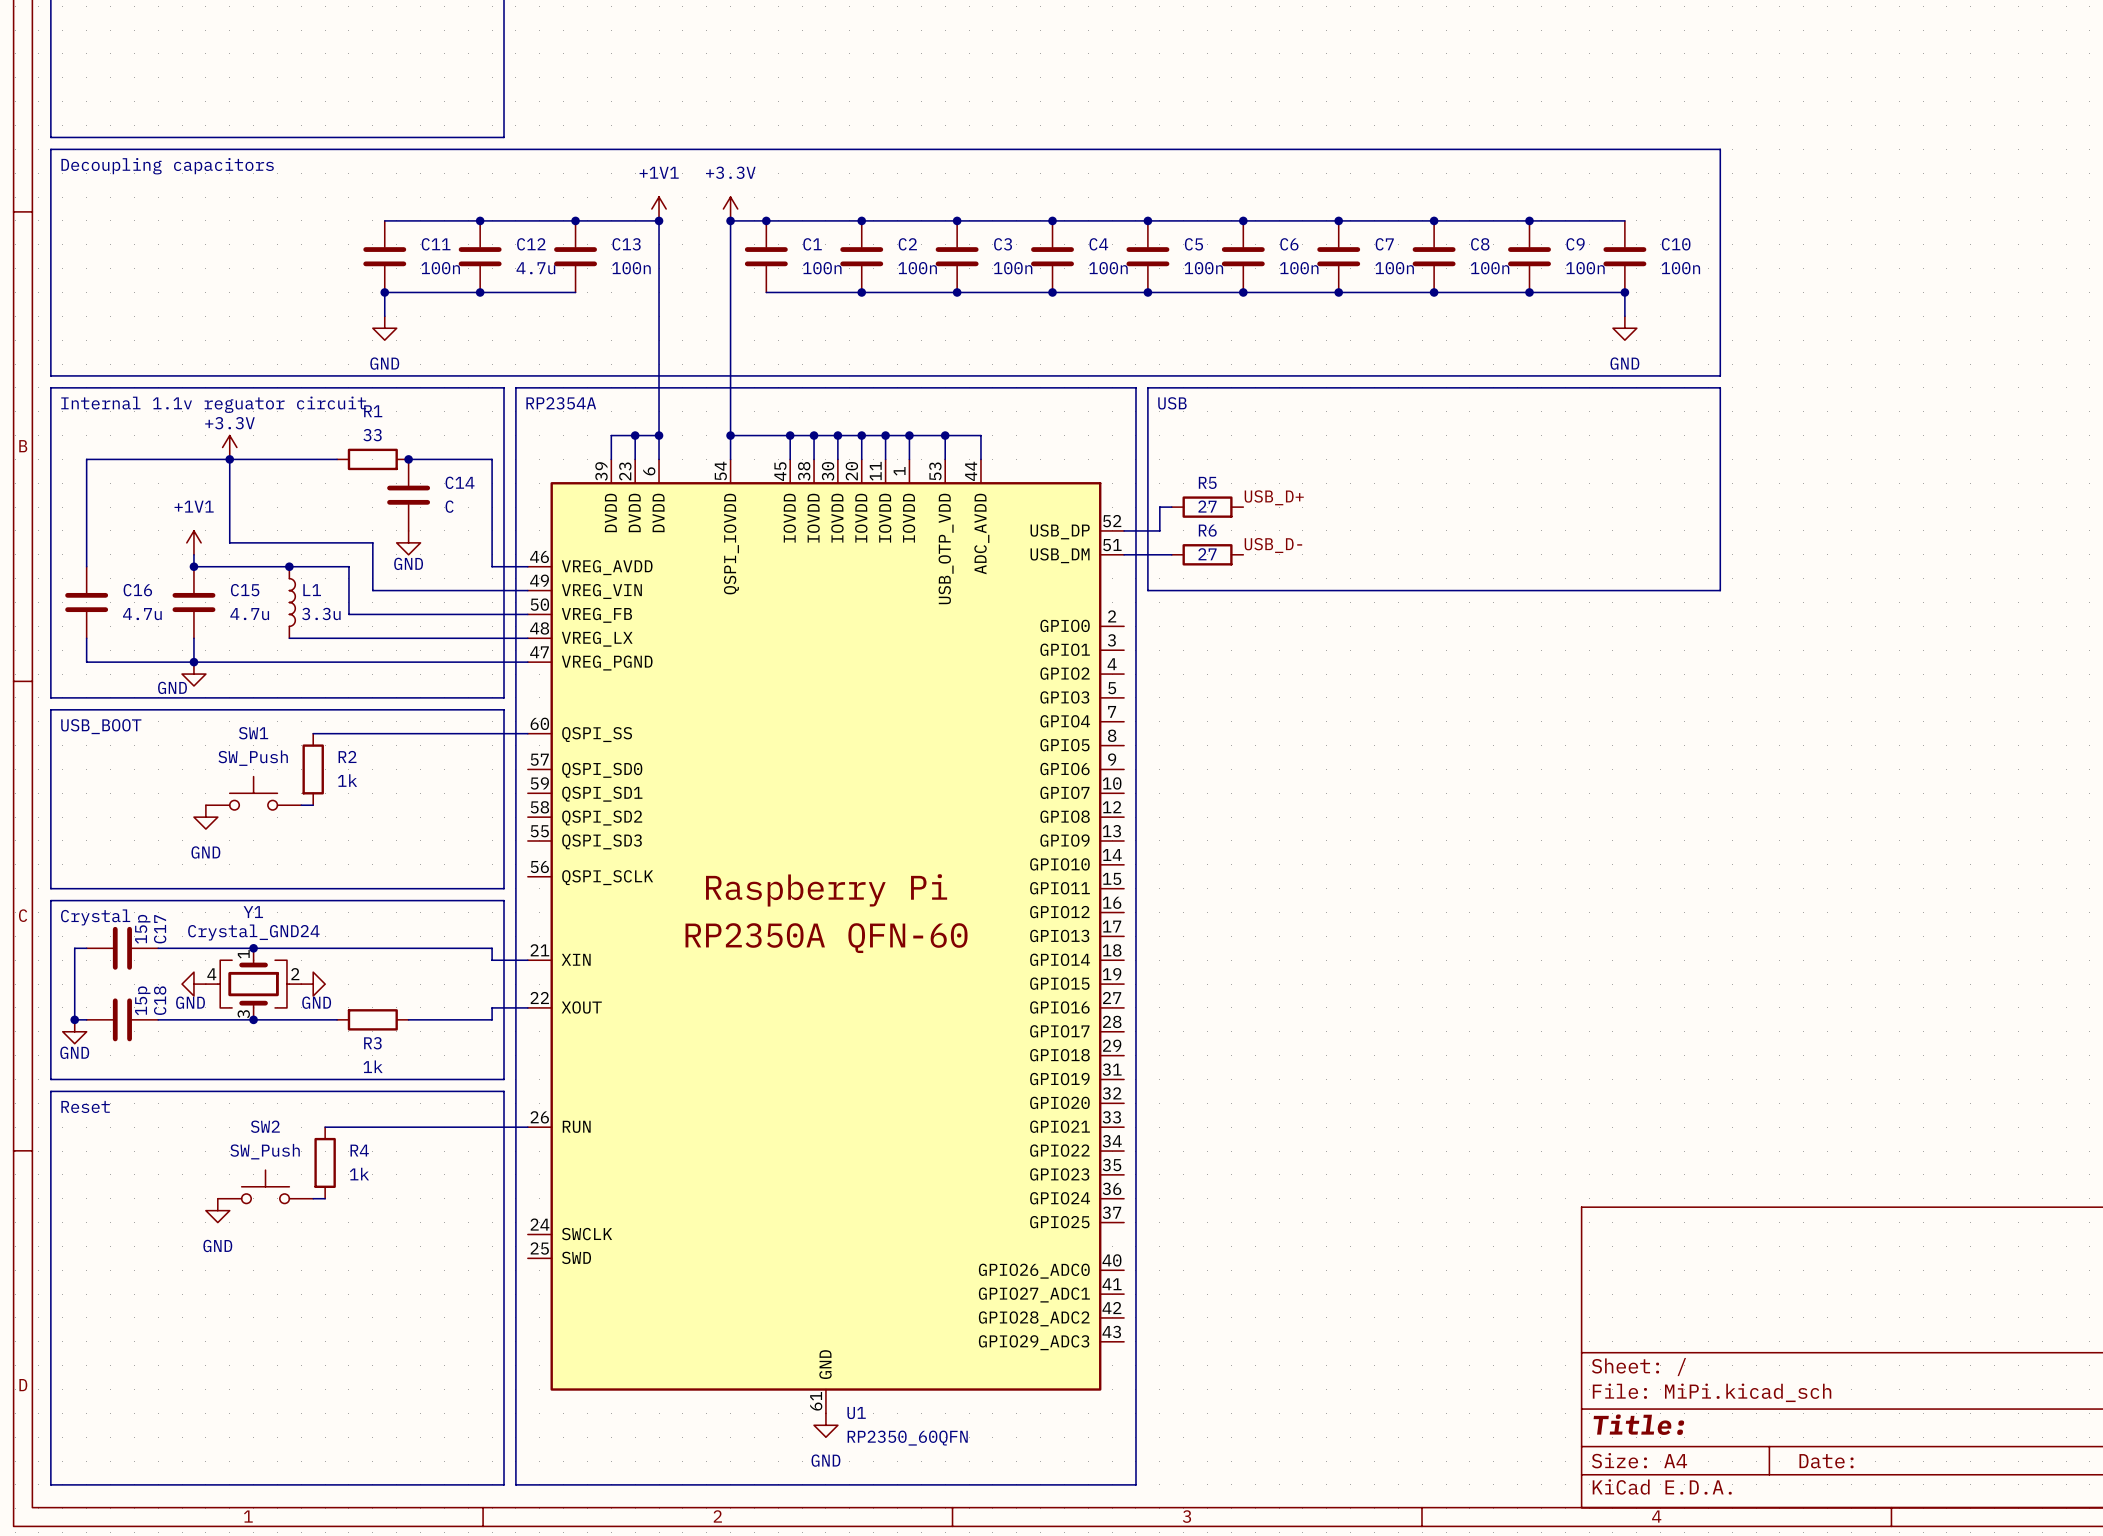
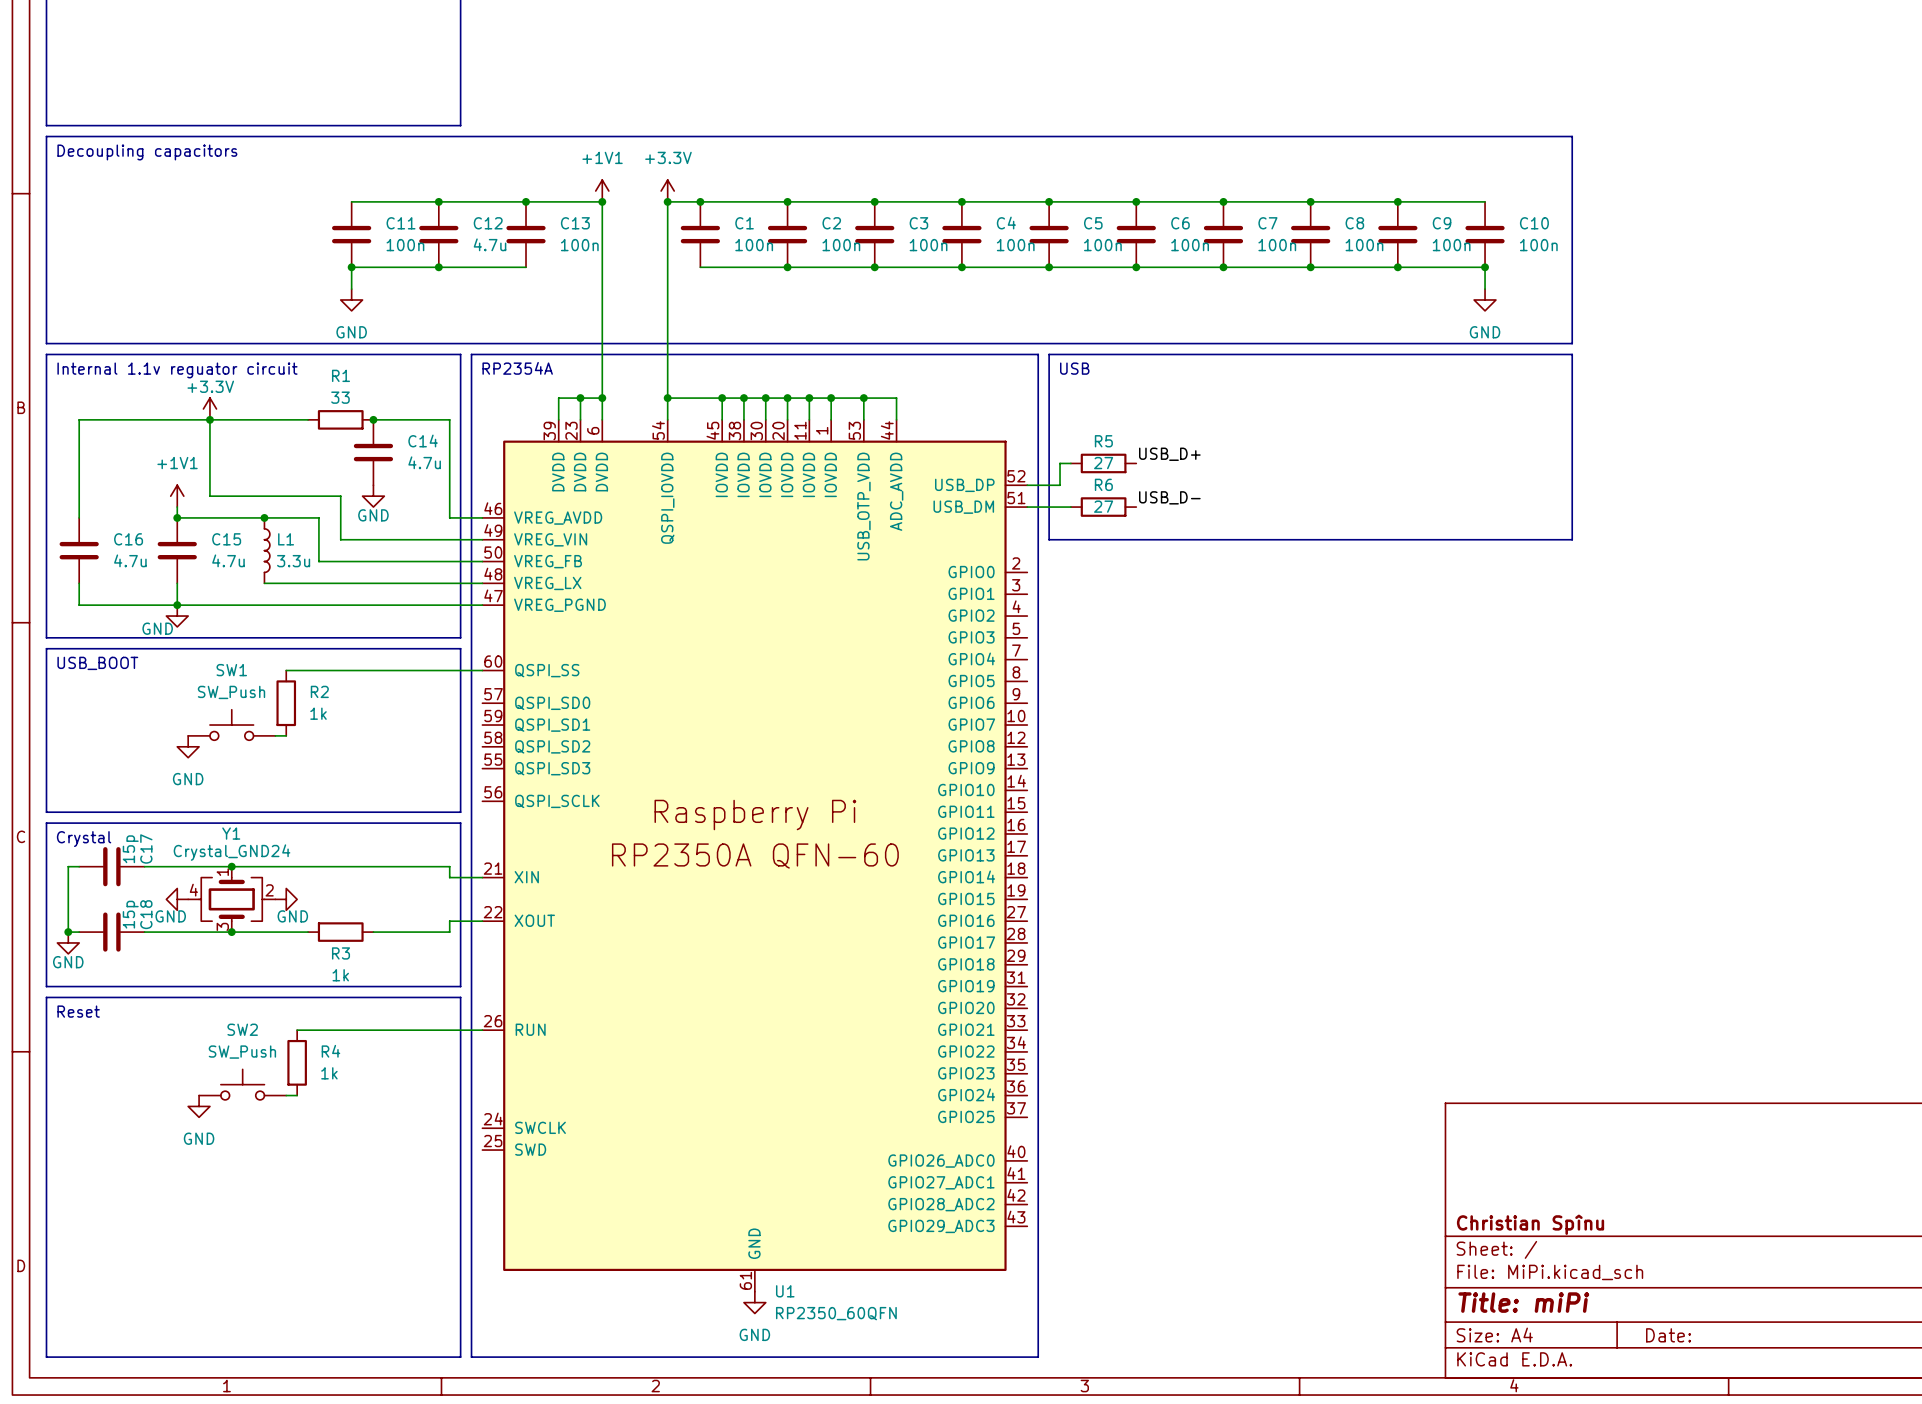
C14 value: C (449, 506) -> 4.7u (424, 462)
title block: none -> Christian Spînu (1530, 1224)
title block: Title: (1638, 1424) -> Title: miPi (1523, 1302)

